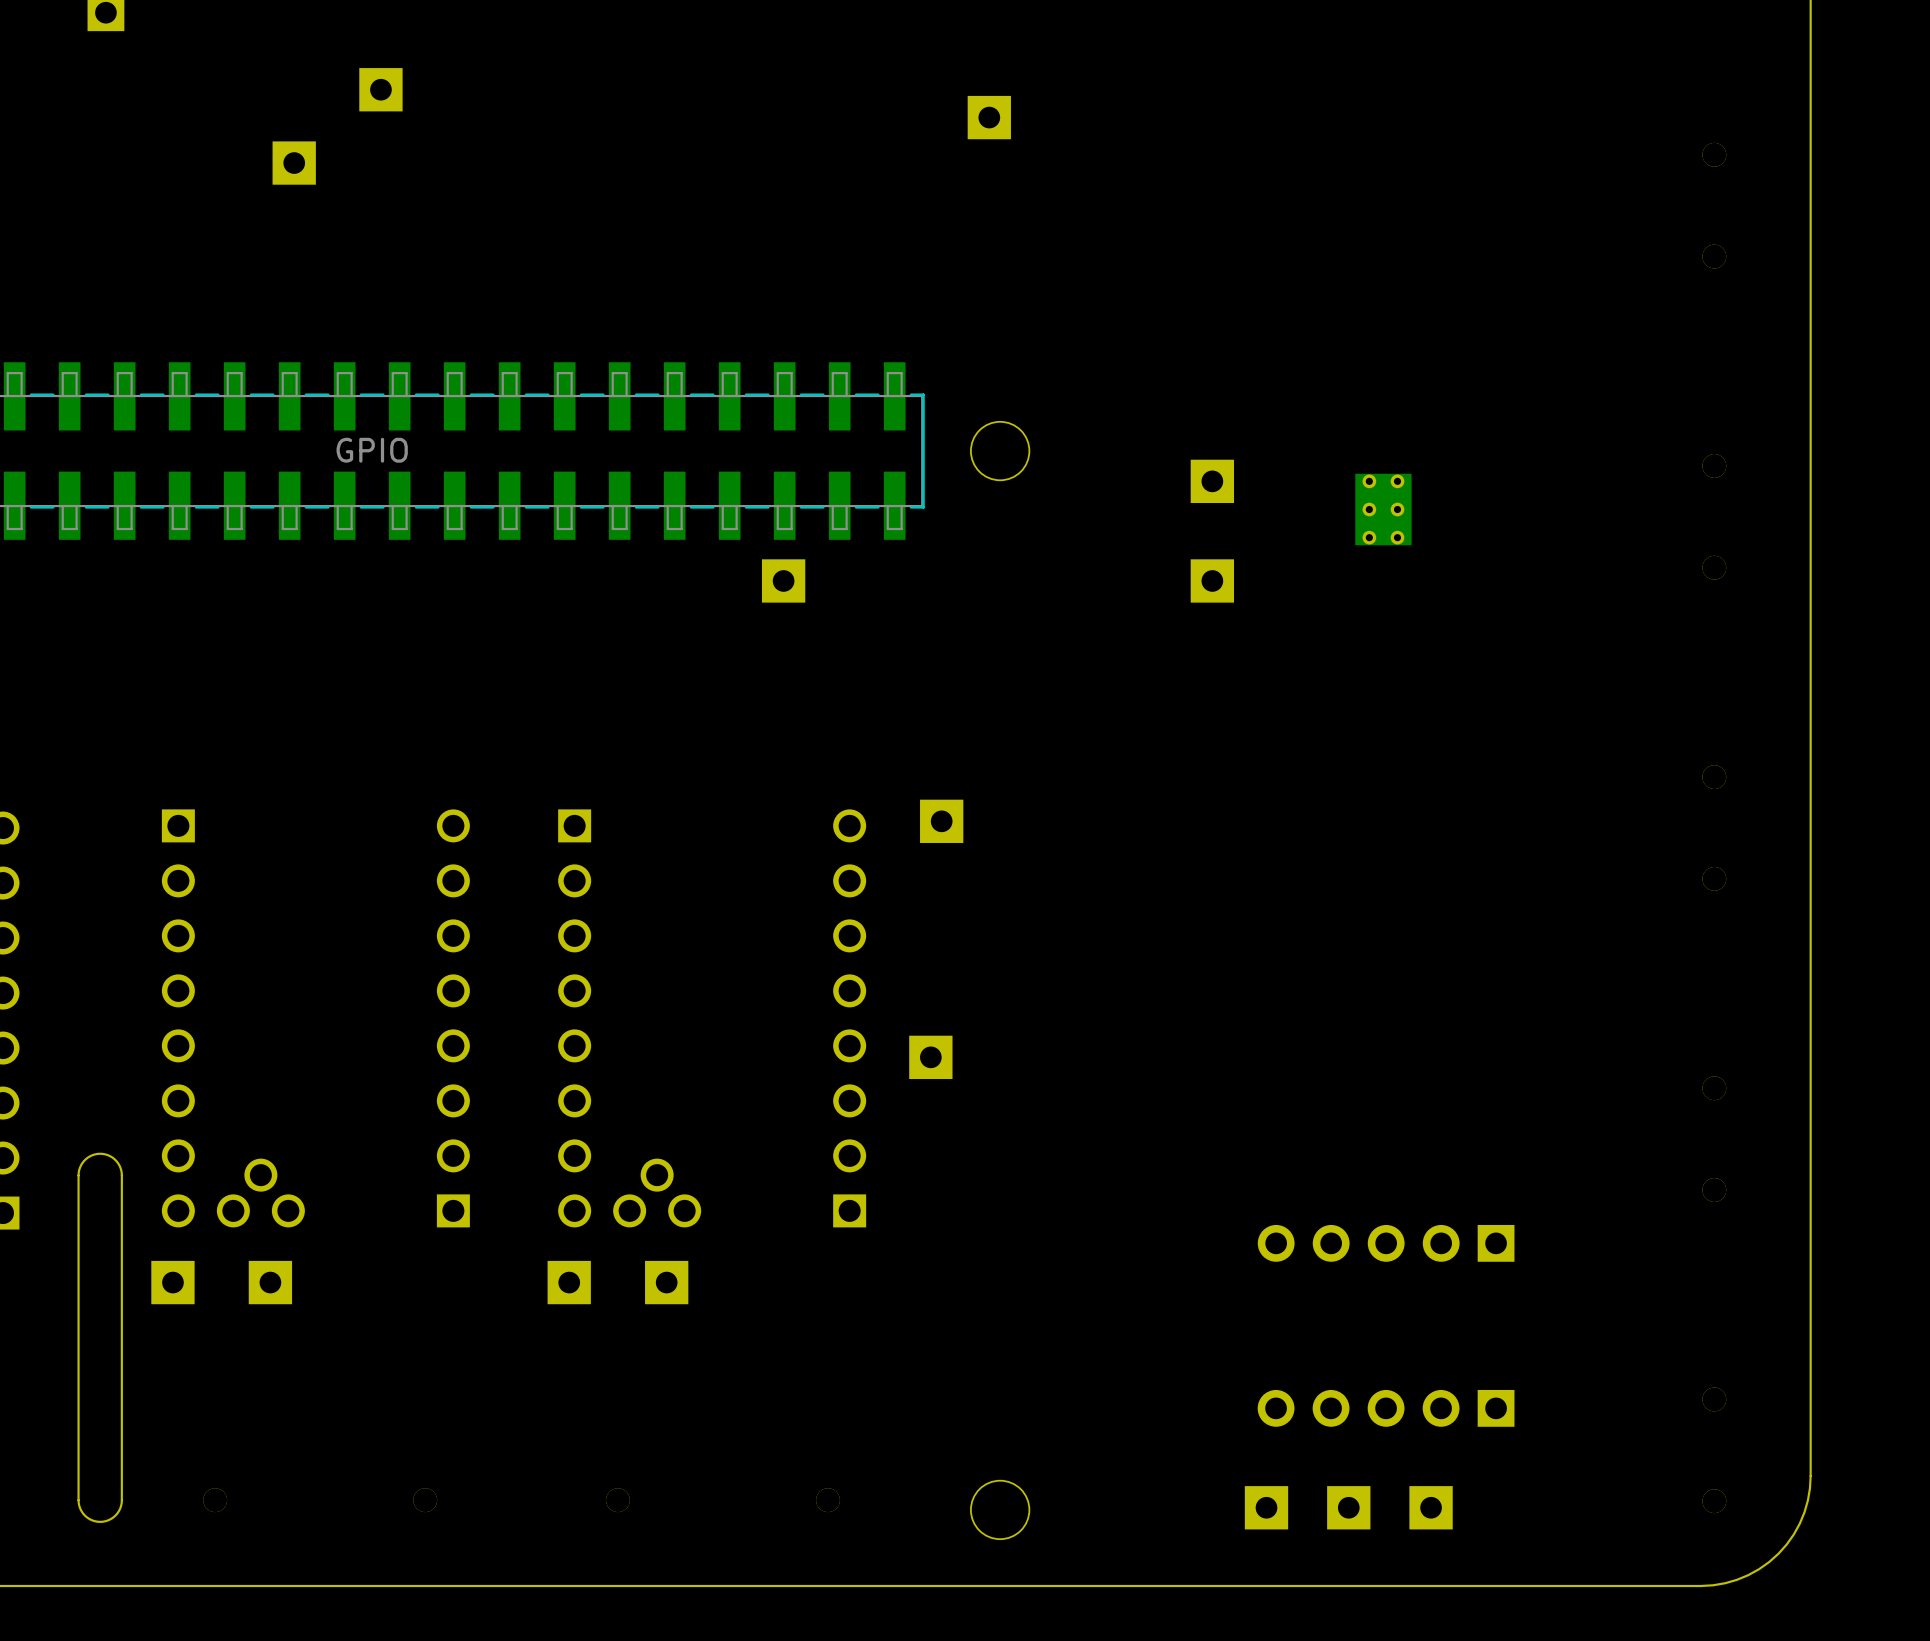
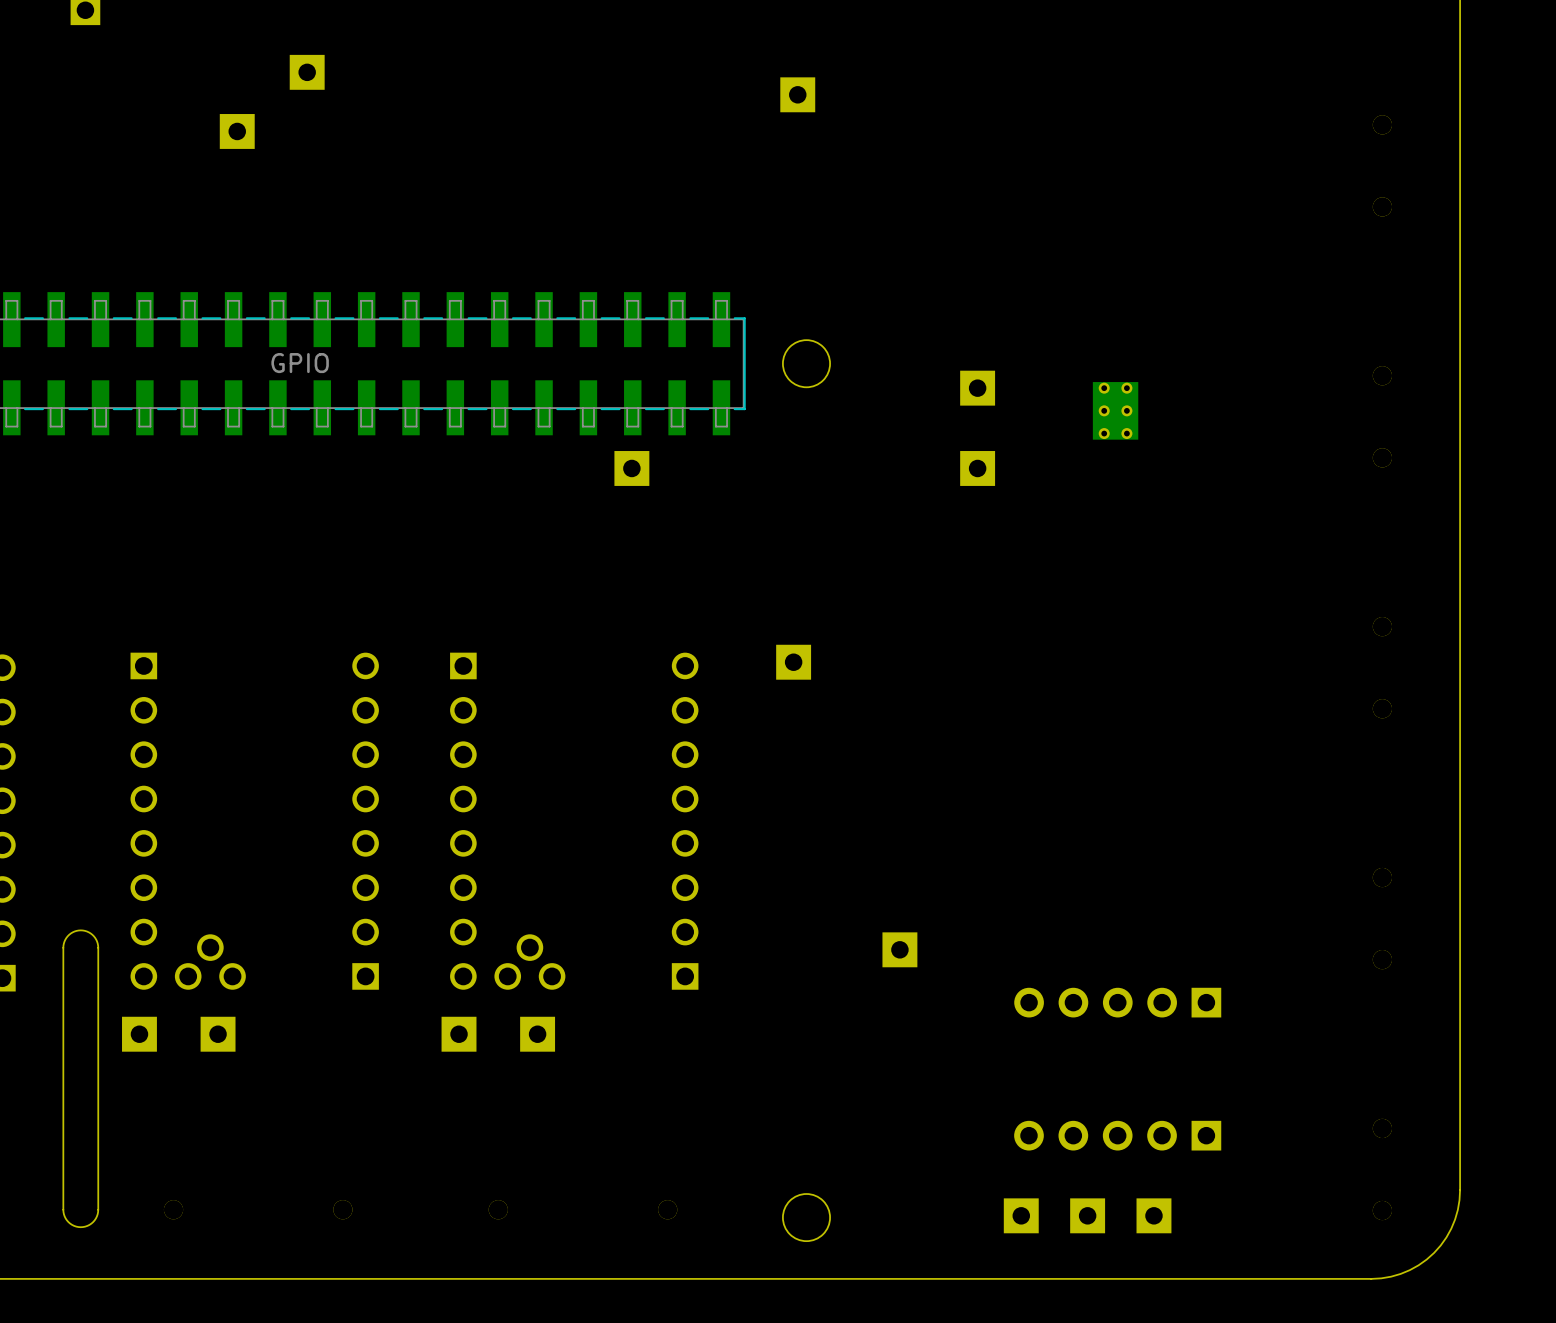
part position: (941, 821) -> (793, 662)
part: (930, 1057) -> none
part: none -> (899, 949)

